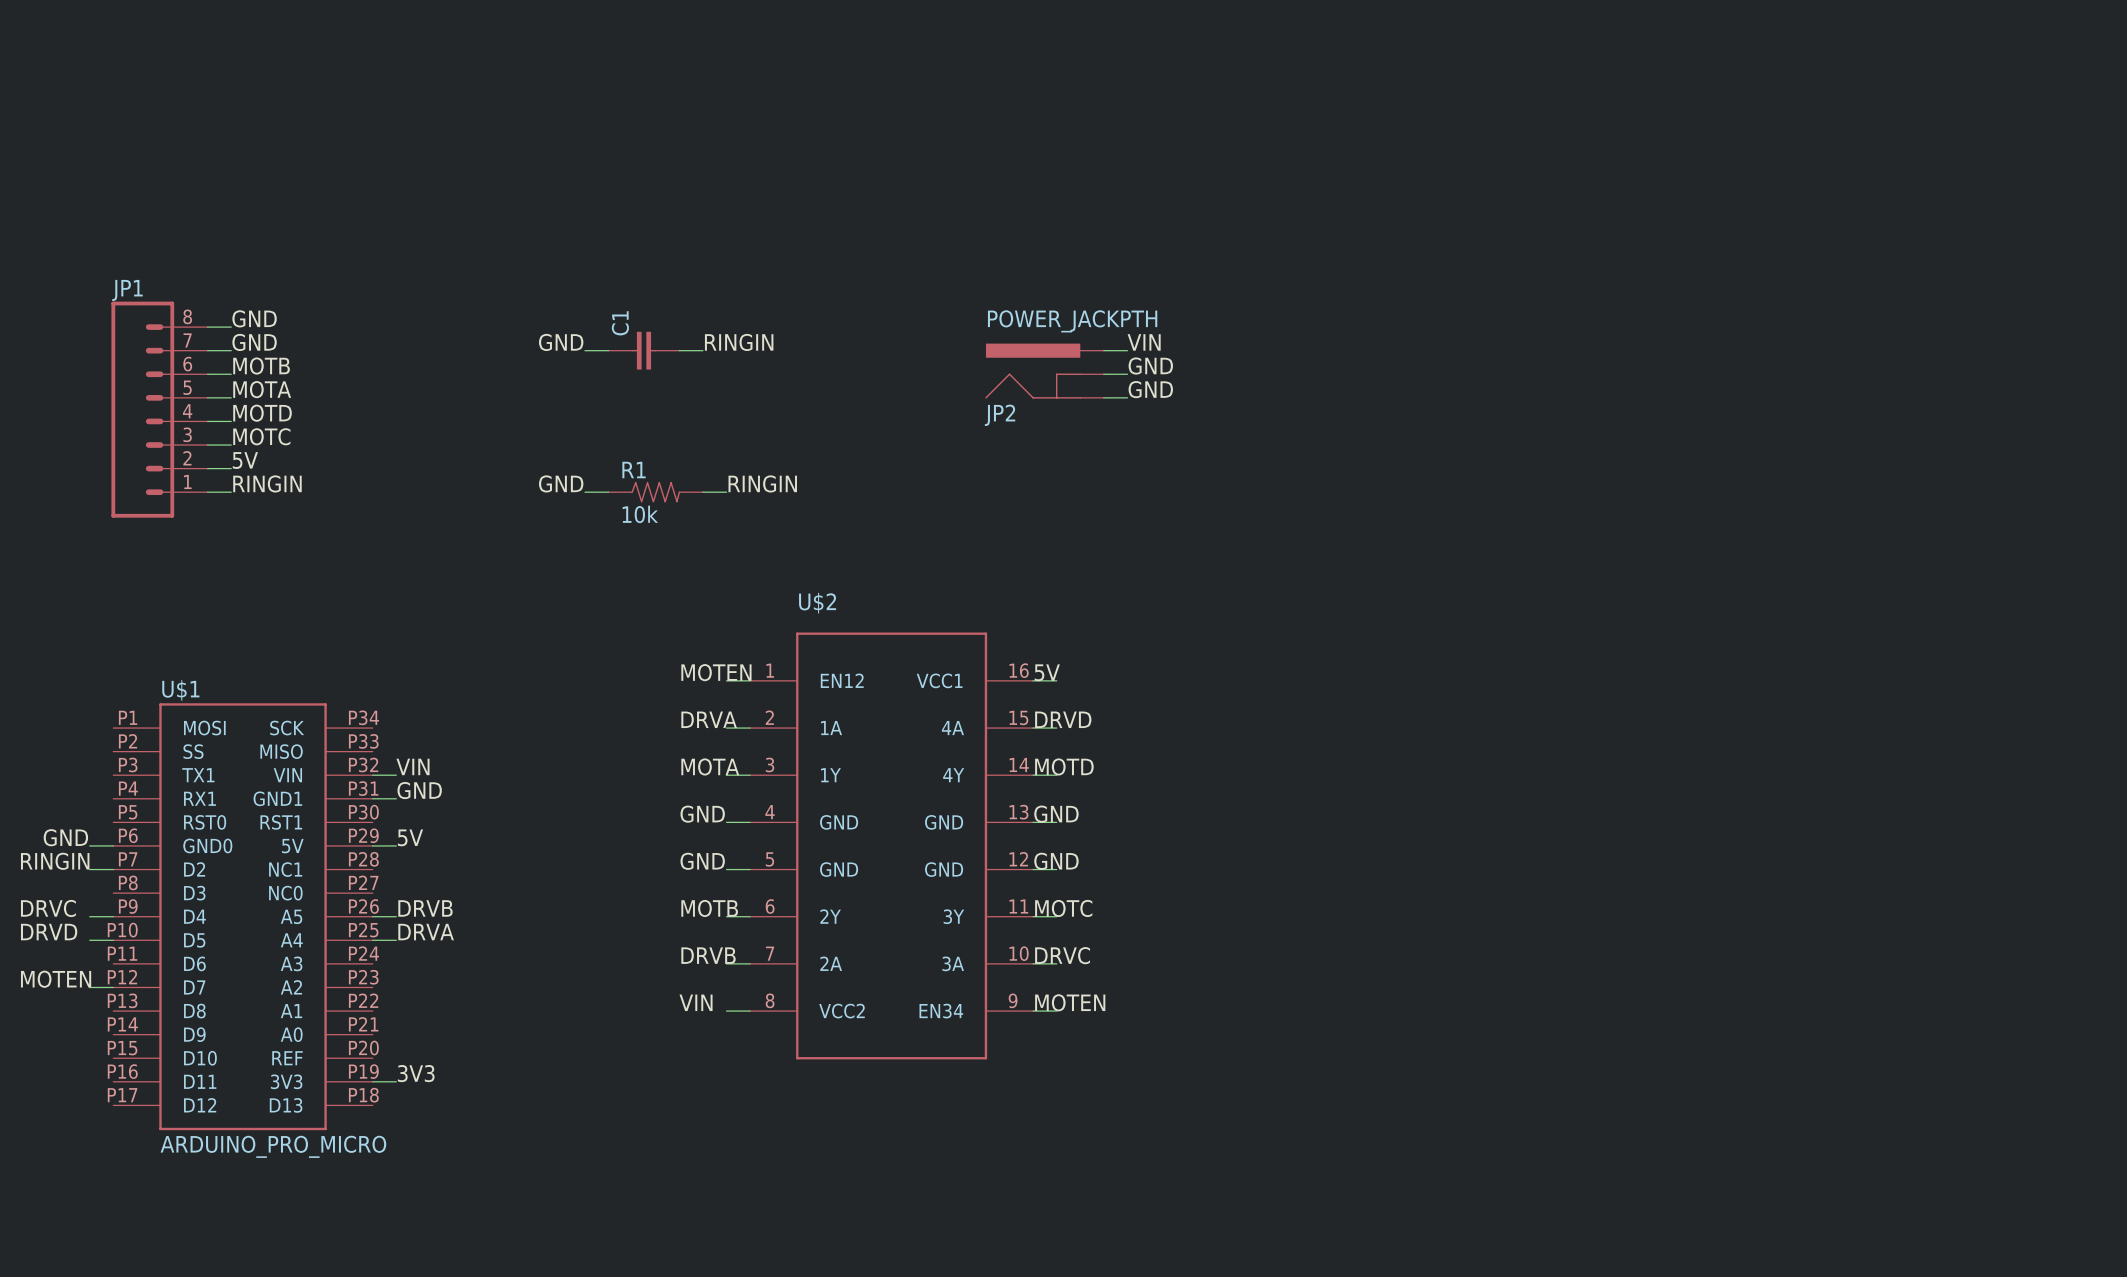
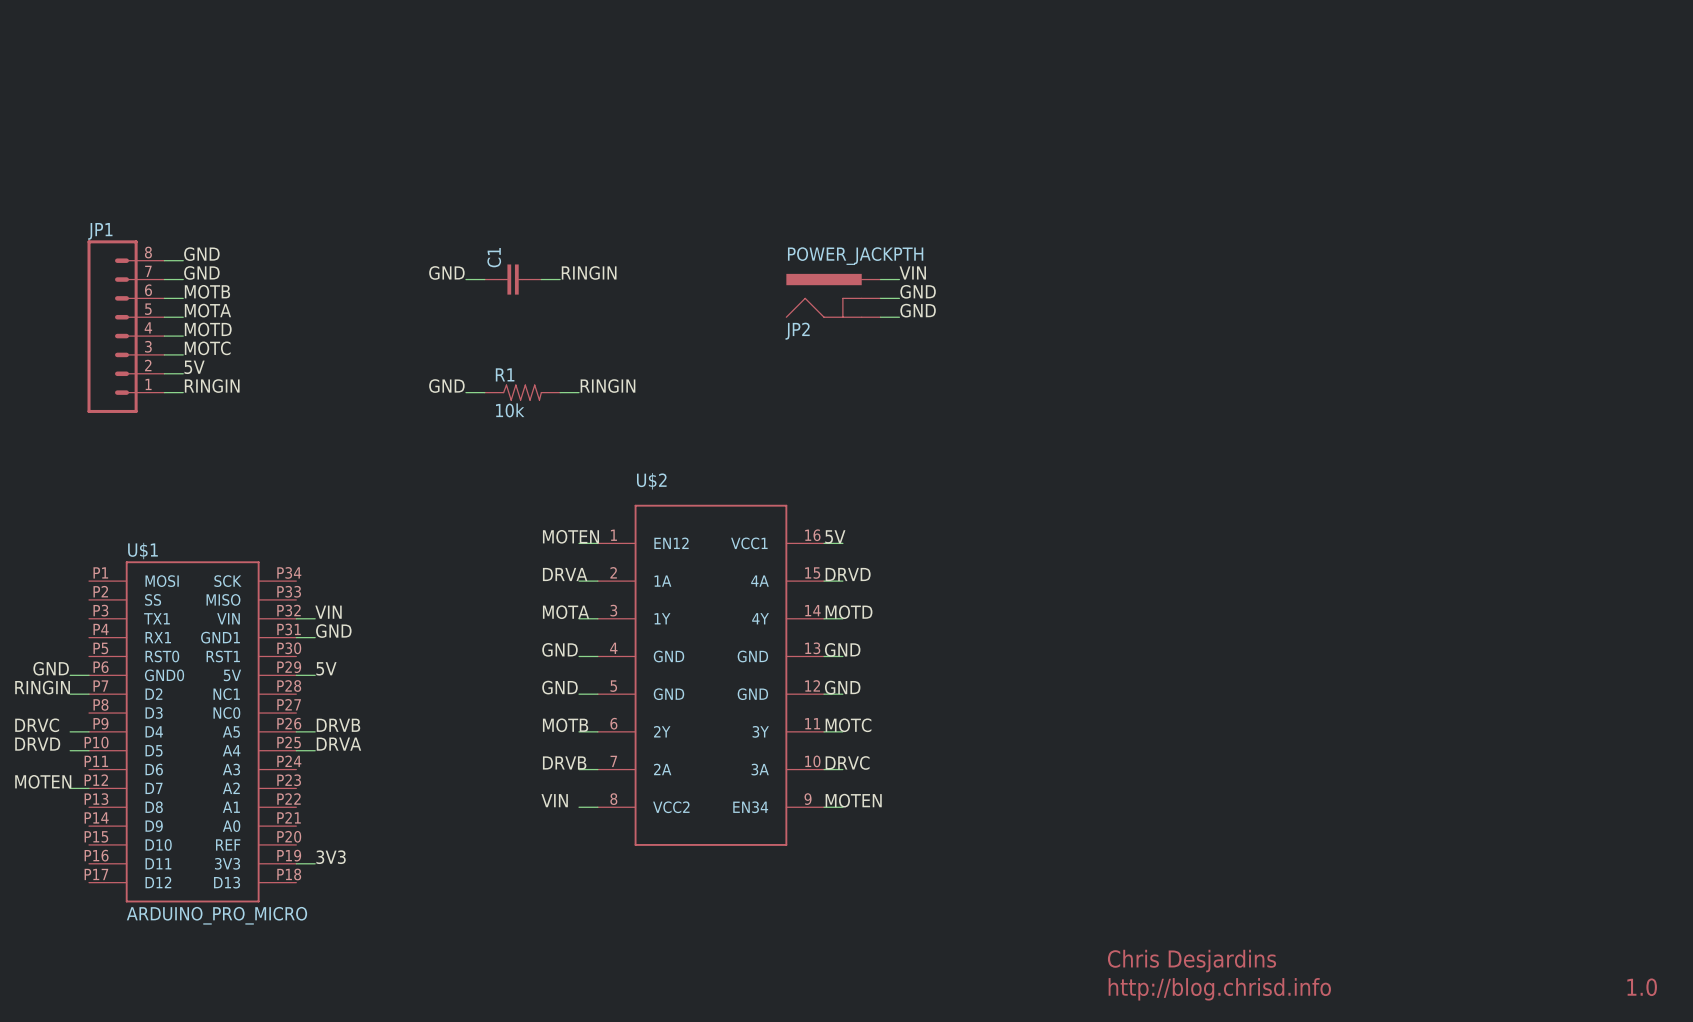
text: none -> Chris Desjardins (1191, 961)
text: none -> 1.0 (1642, 987)
text: none -> http://blog.chrisd.info (1219, 989)

